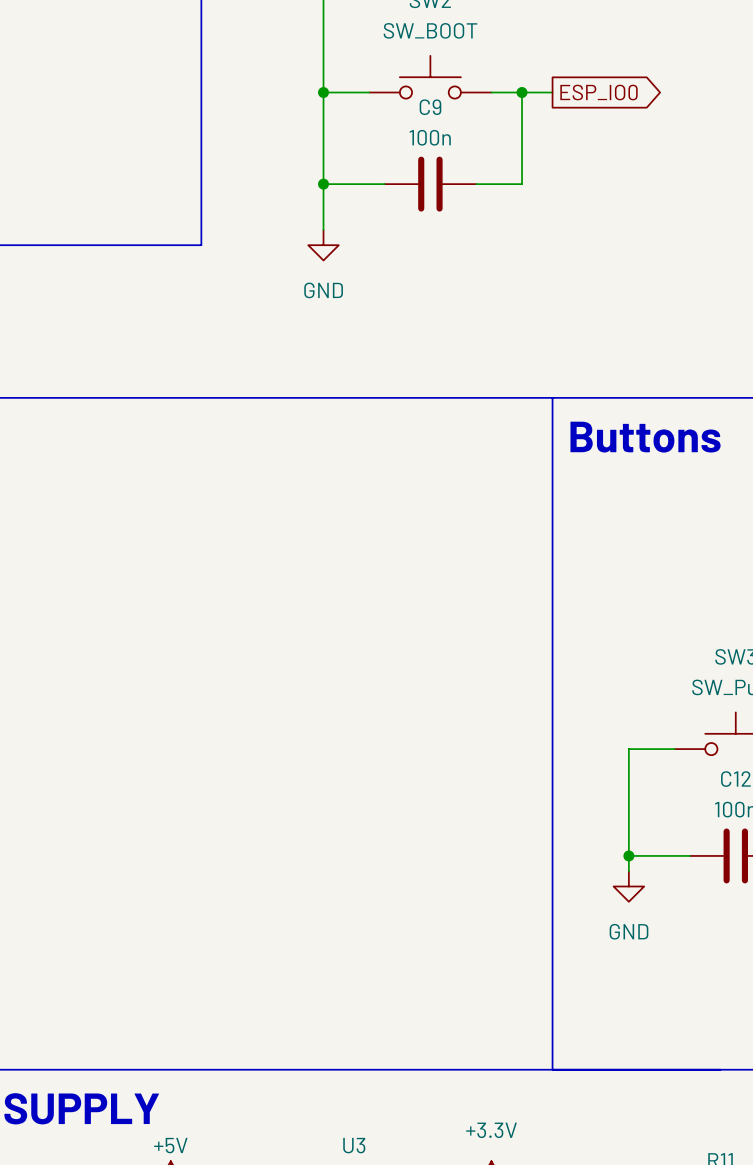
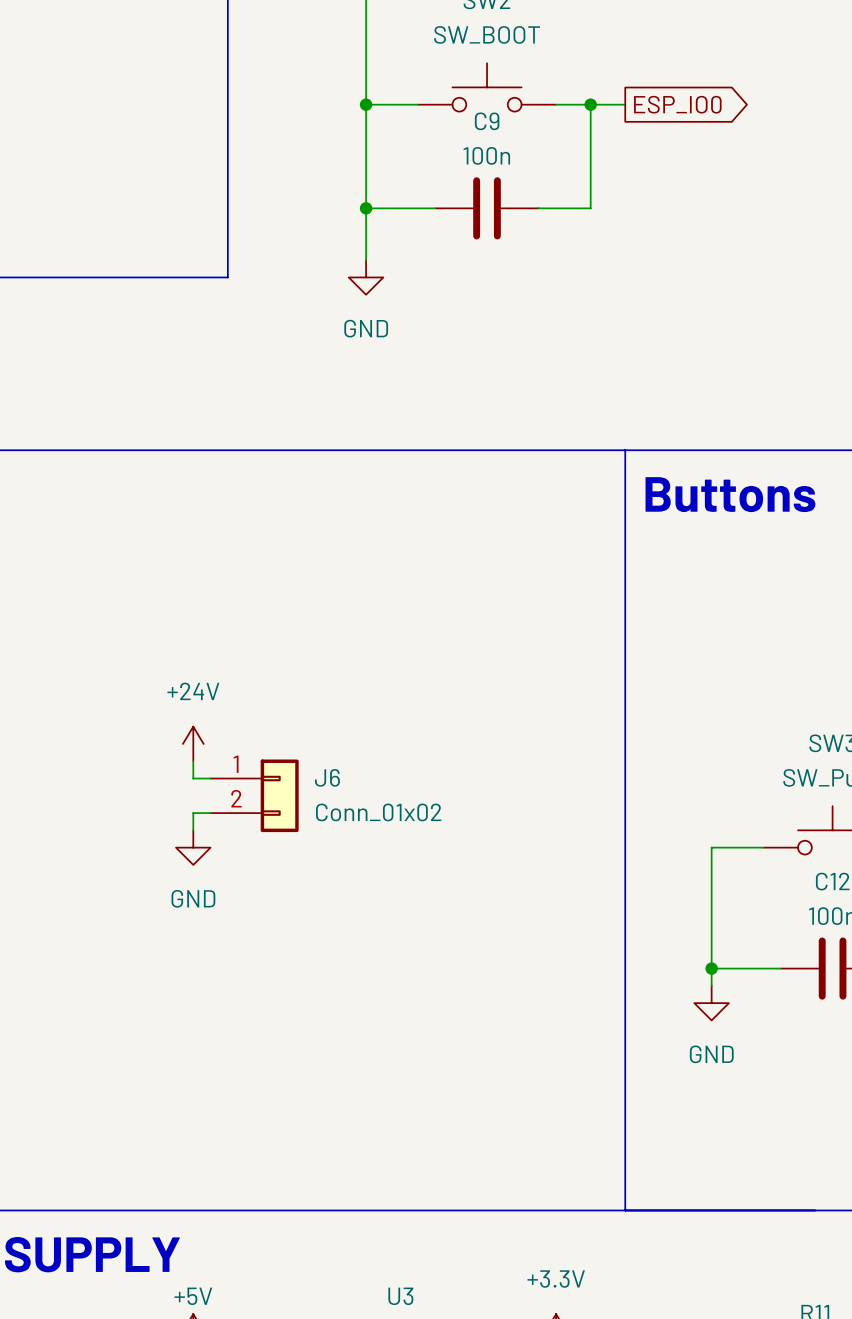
power symbol: none -> +24V (193, 743)
wire: none -> (193, 761) (193, 778) (210, 778)
J6: none -> Conn_01x02 (254, 795)
wire: none -> (210, 813) (193, 813) (193, 830)
power symbol: none -> GND (193, 847)

